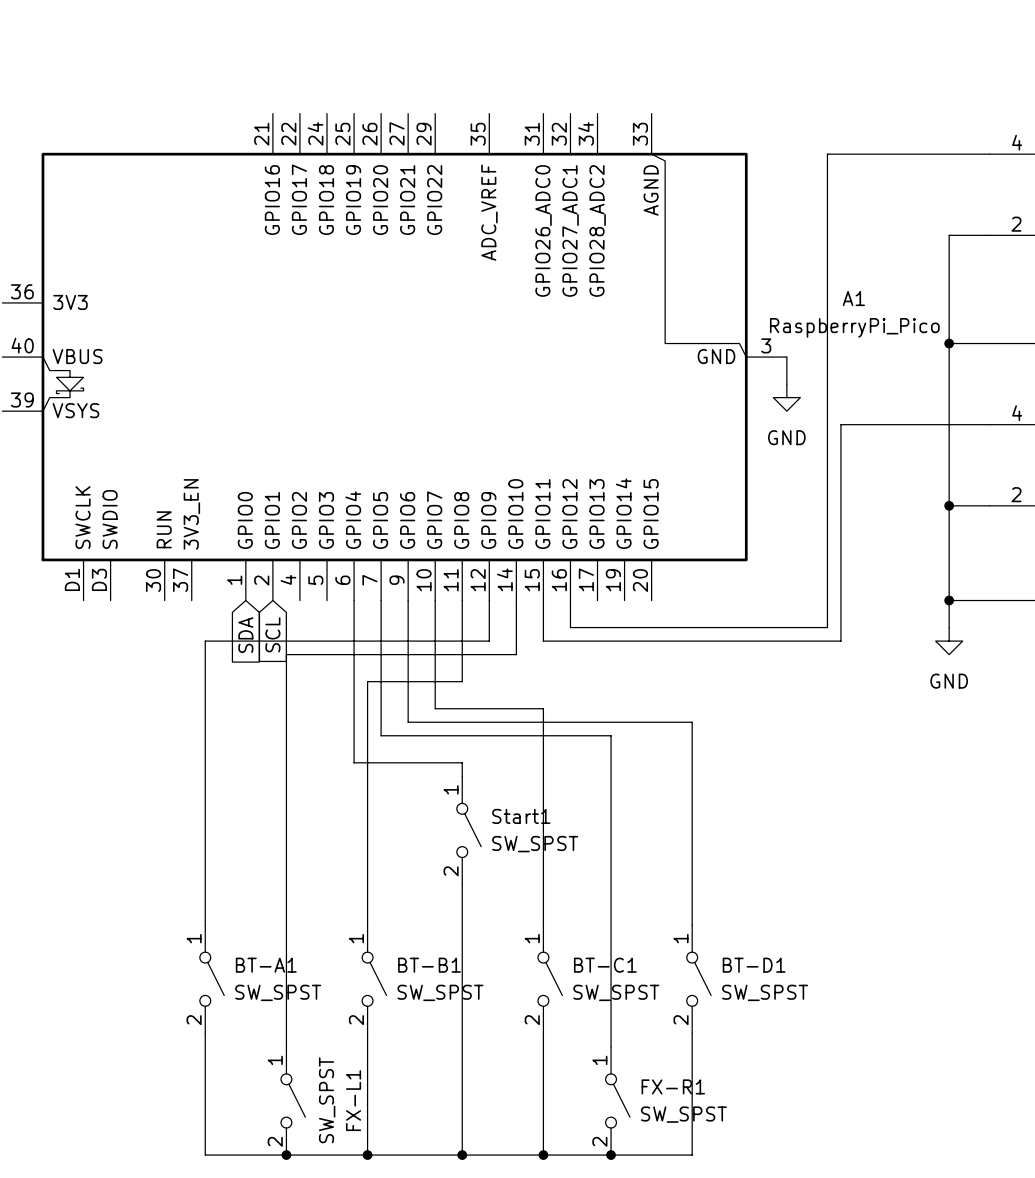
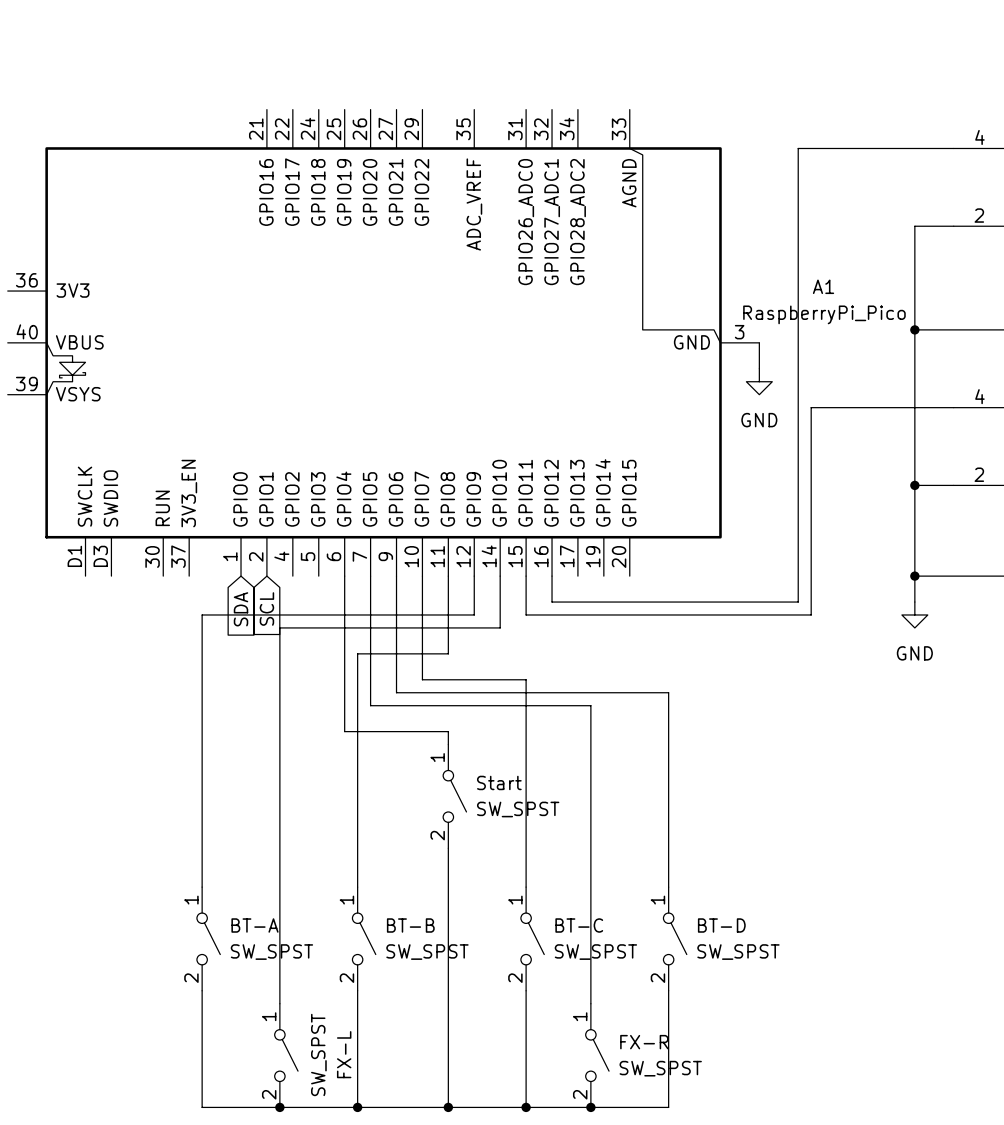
Start1 name: Start1 (521, 816) -> Start (499, 782)
BT-A1 name: BT-A1 (266, 965) -> BT-A (254, 925)
BT-B1 name: BT-B1 (429, 965) -> BT-B (410, 925)
BT-C1 name: BT-C1 (605, 965) -> BT-C (579, 925)
BT-D1 name: BT-D1 (754, 965) -> BT-D (721, 925)
FX-R1 name: FX-R1 (673, 1086) -> FX-R (644, 1042)
FX-L1 name: FX-L1 (353, 1100) -> FX-L (344, 1054)

